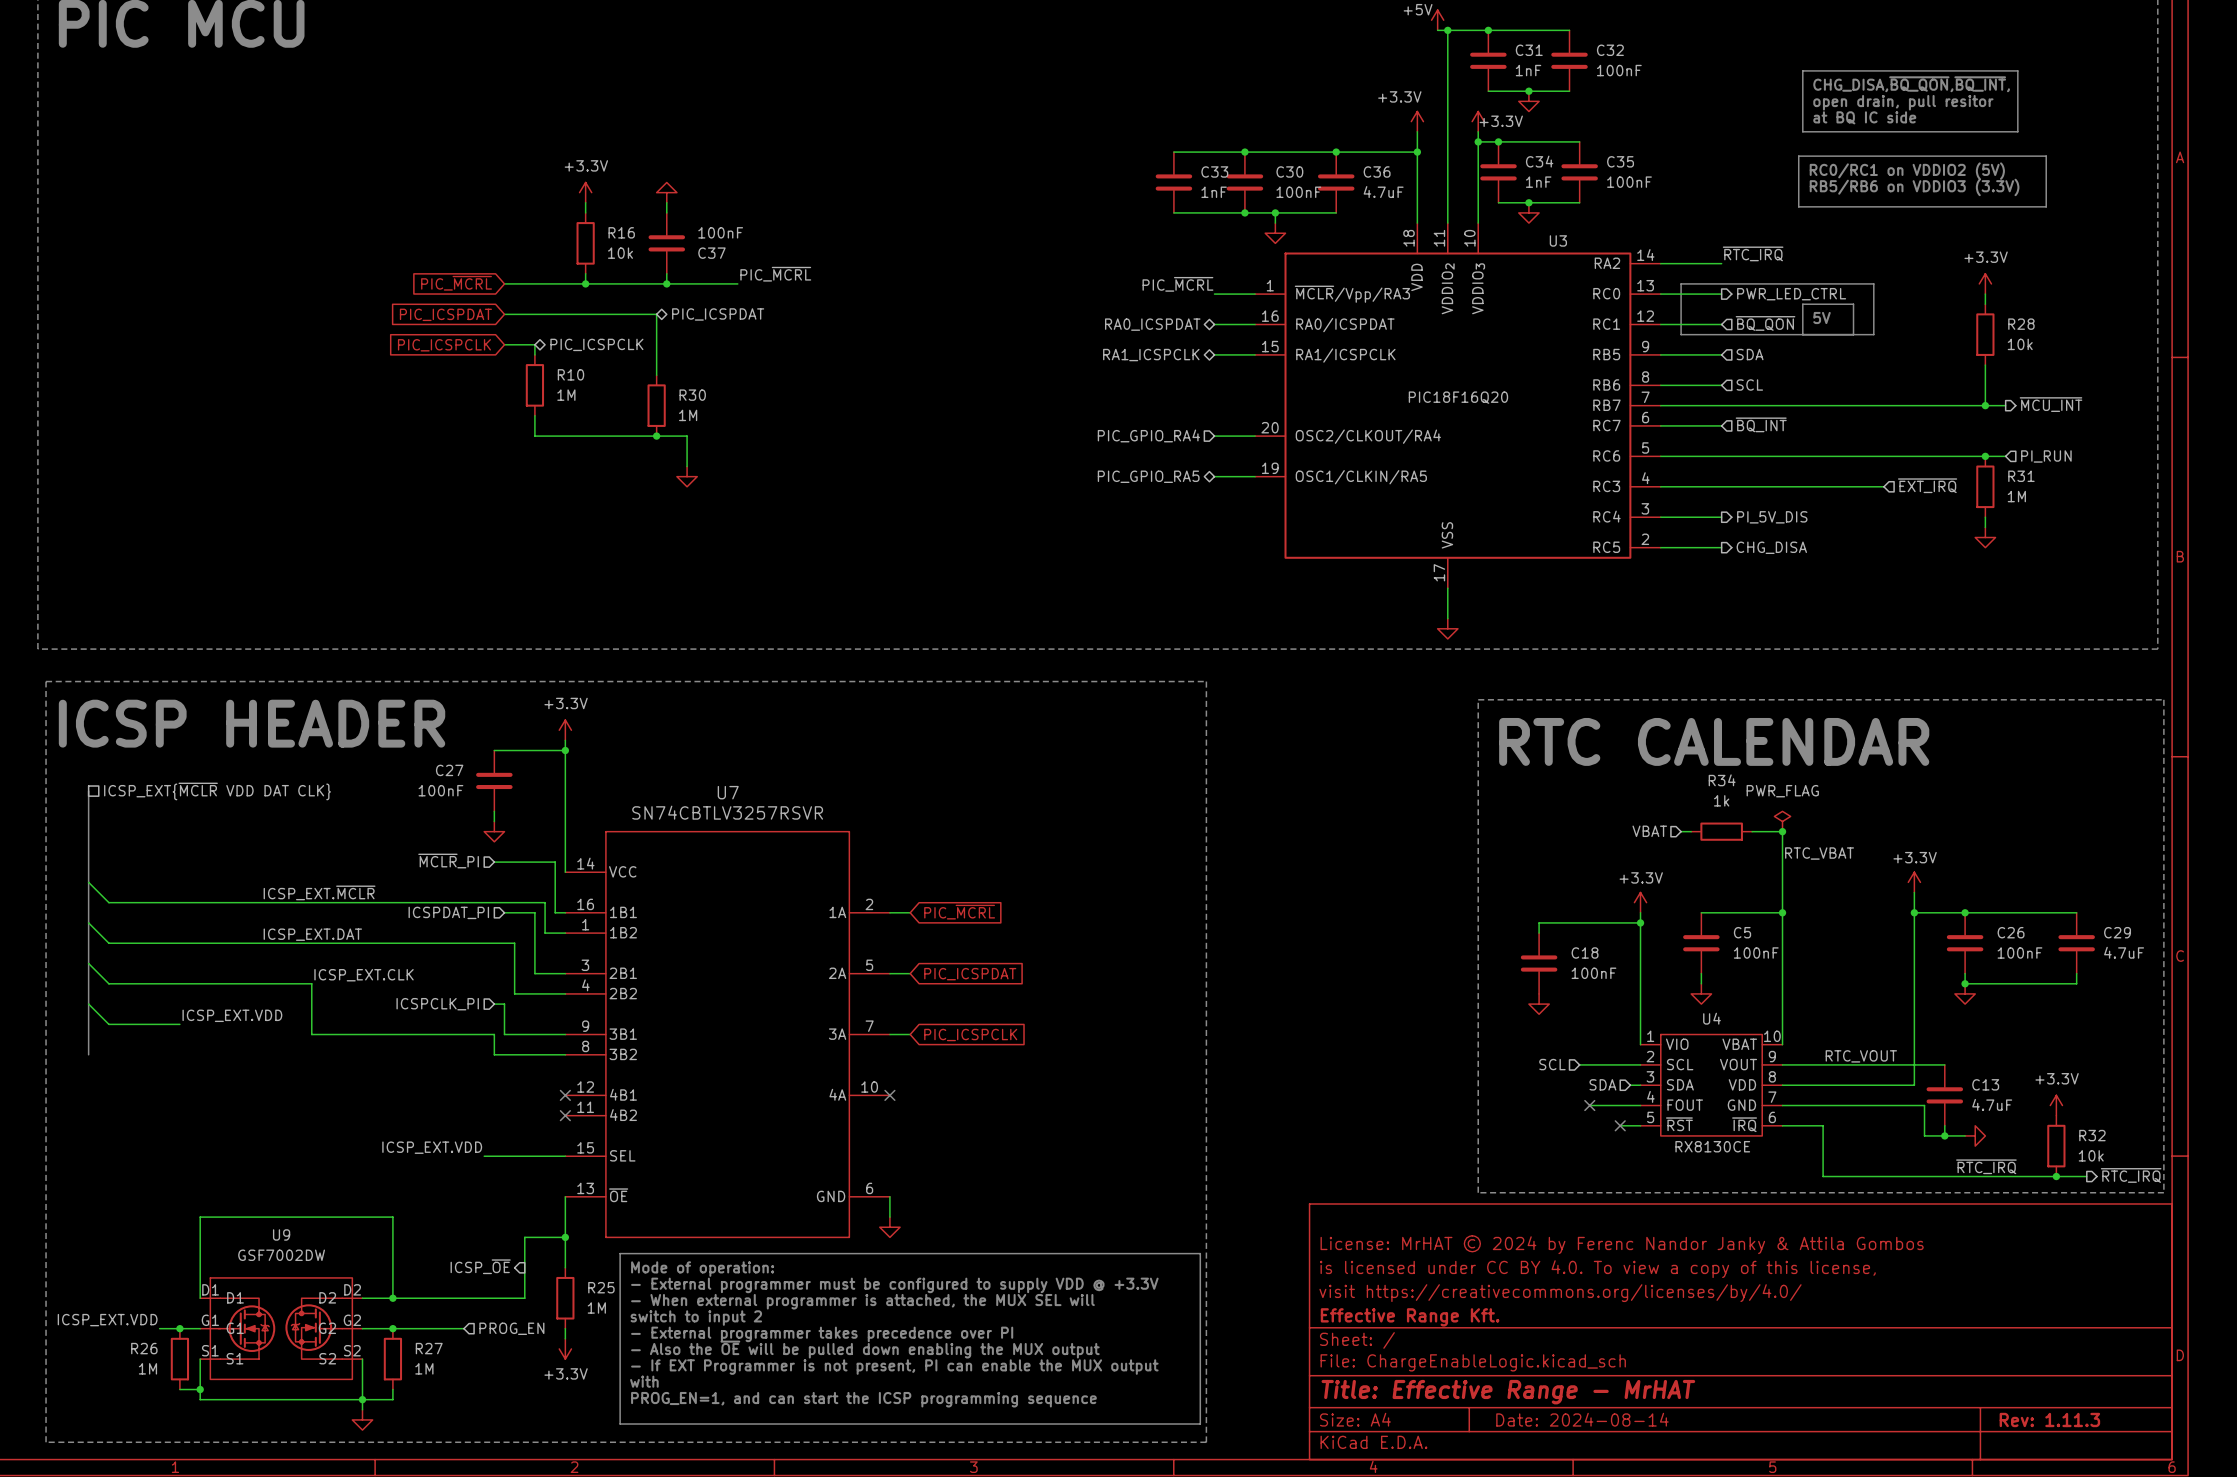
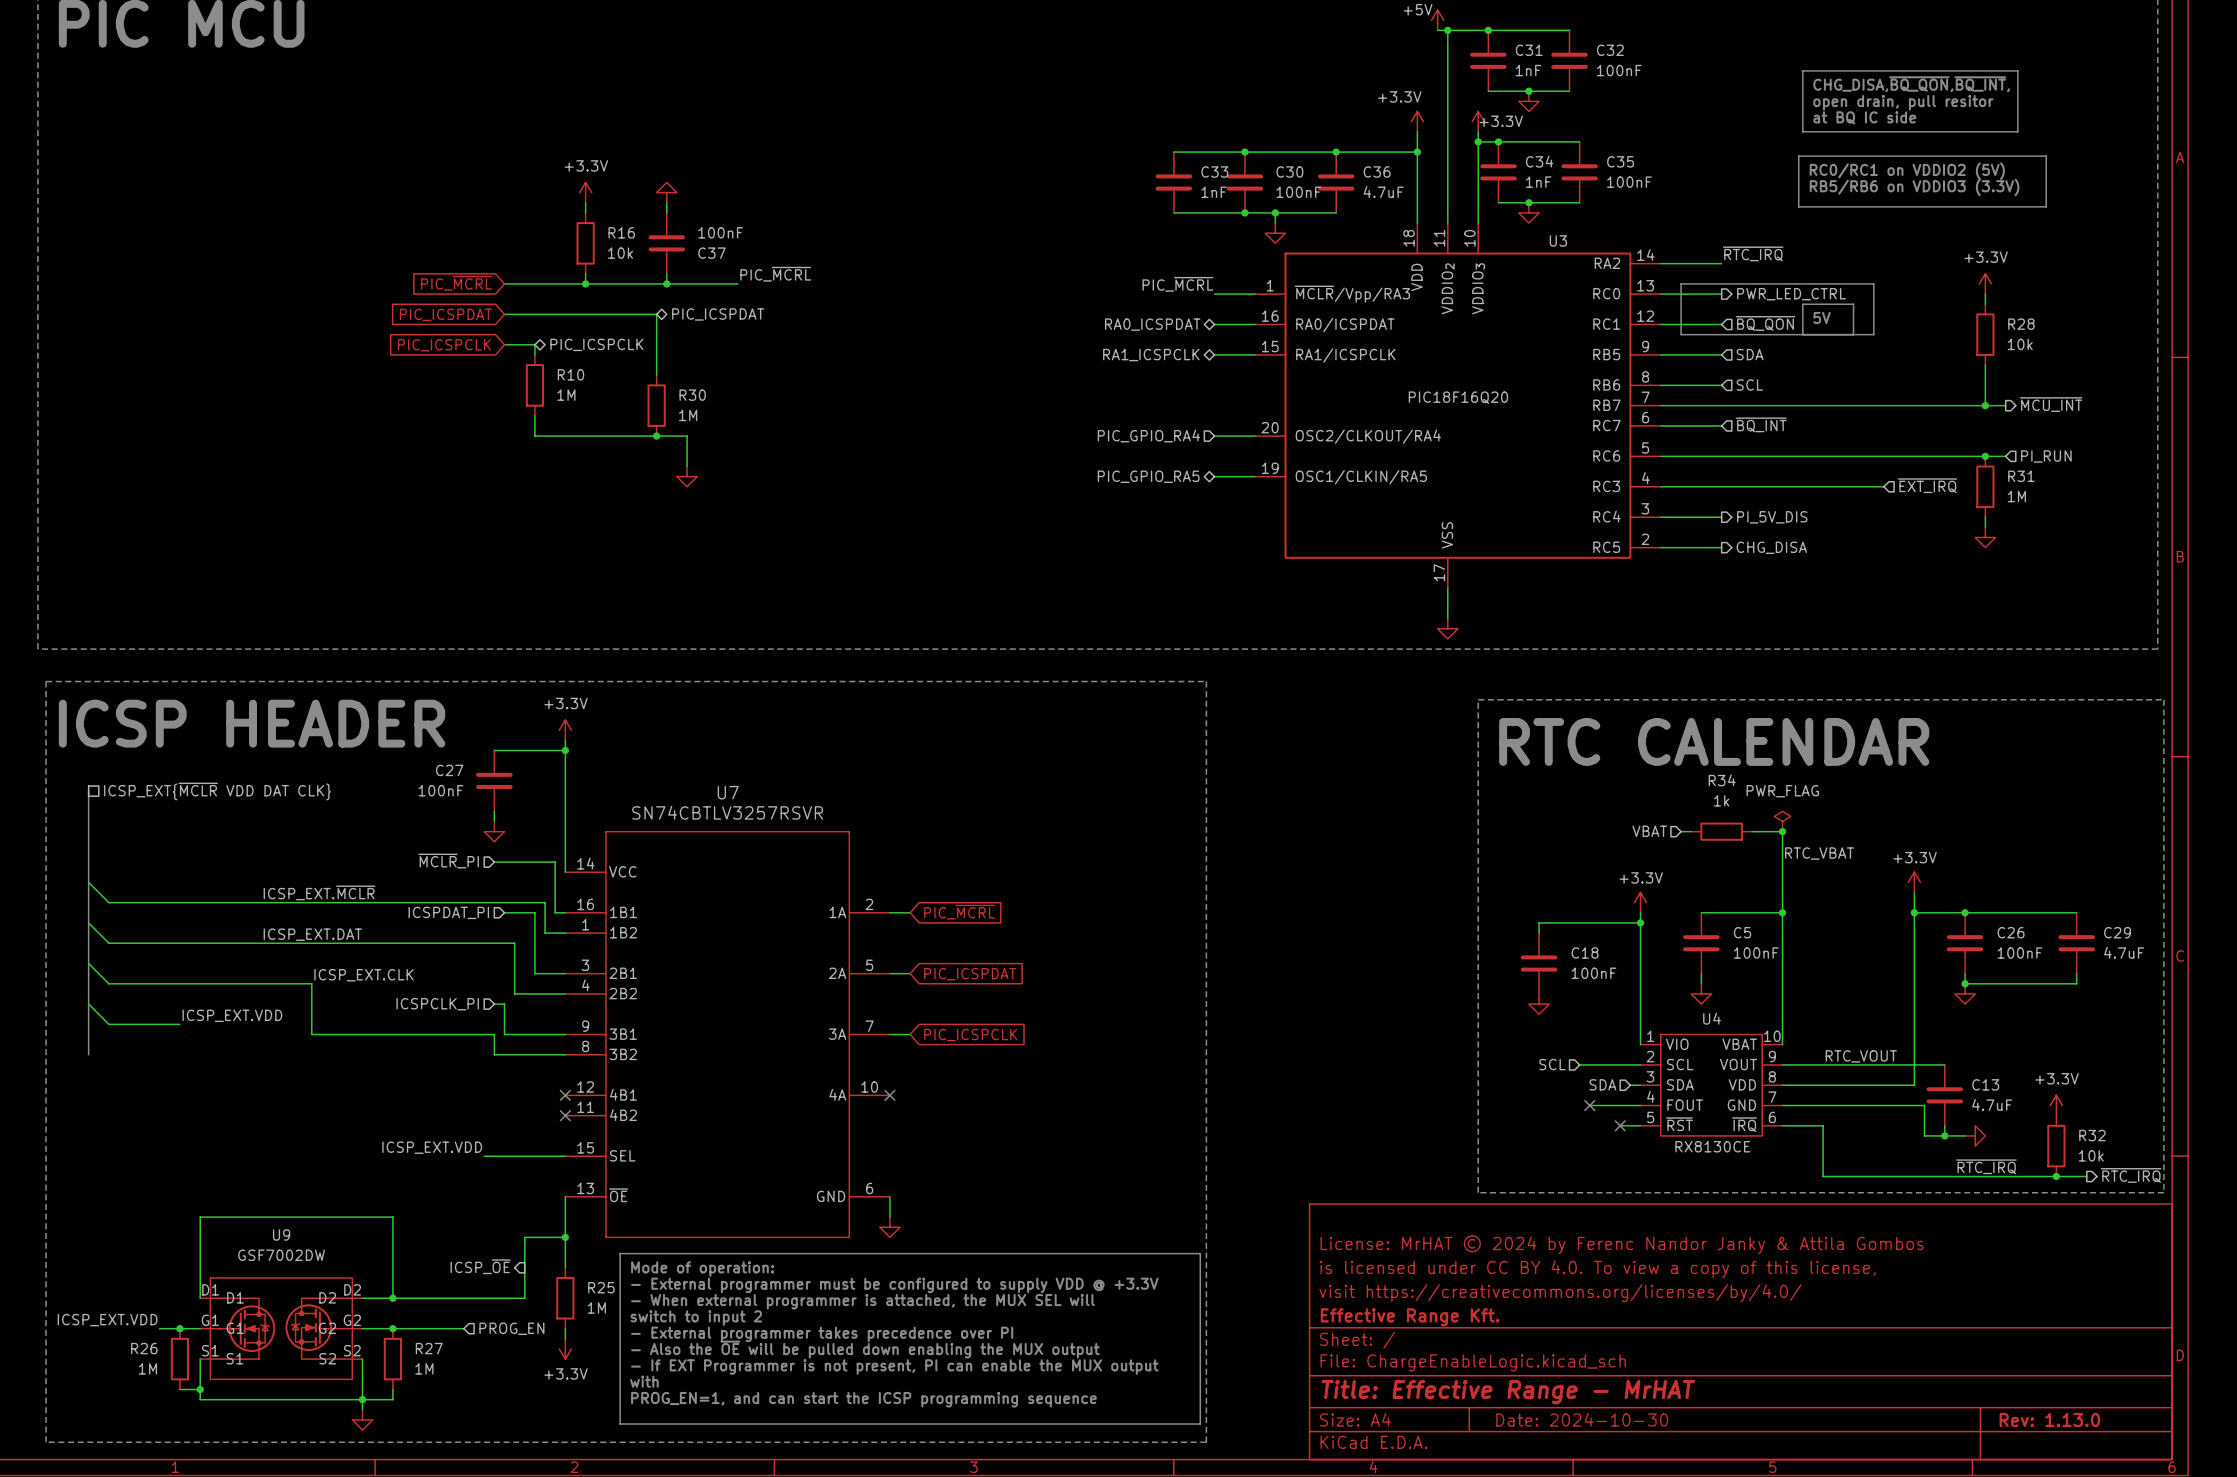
title block: Date: 2024-08-14 (1582, 1419) -> Date: 2024-10-30 (1582, 1419)
title block: Rev: 1.11.3 (2049, 1419) -> Rev: 1.13.0 (2049, 1419)

